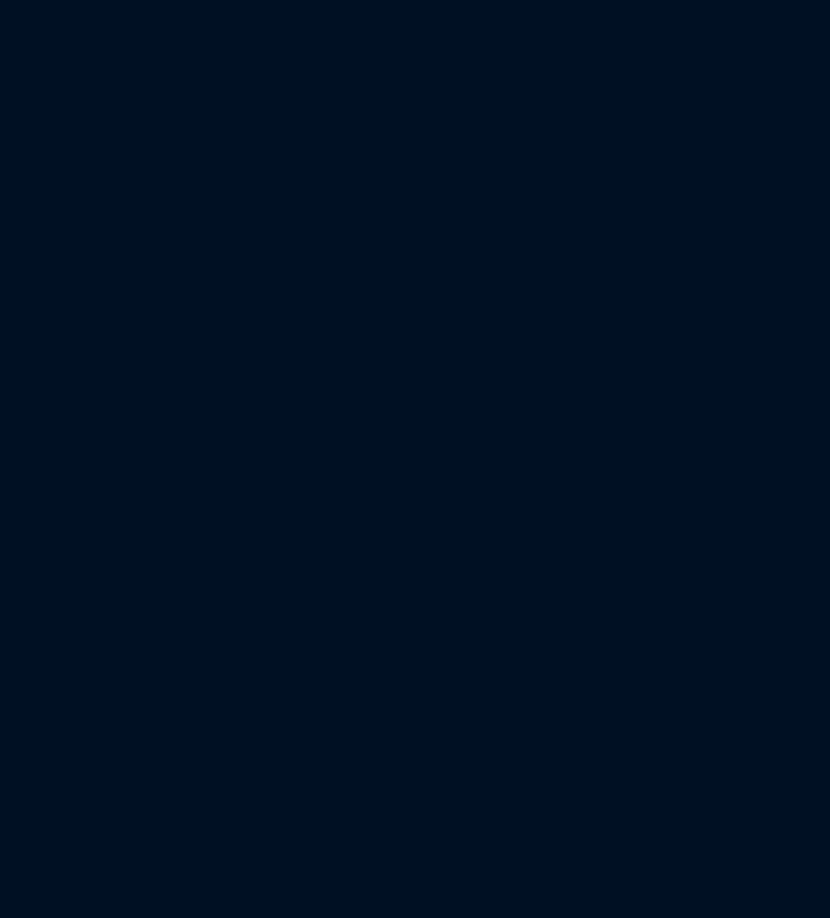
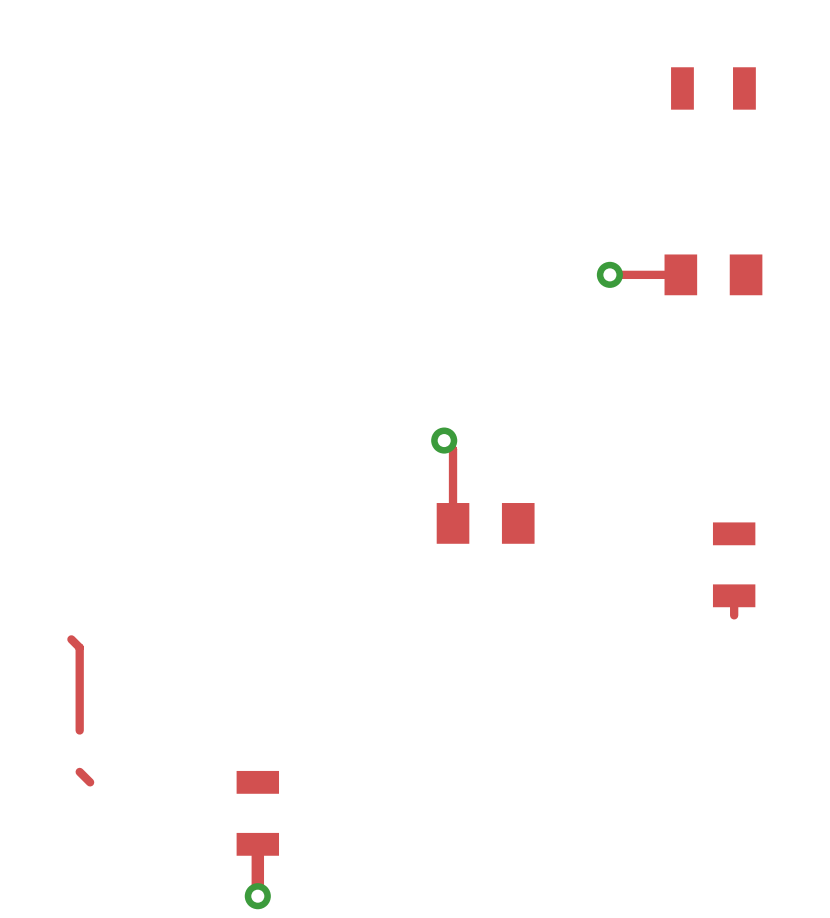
part: none -> (713, 88)
via: none -> (609, 274)
top track: none -> (680, 274) (609, 274)
part: none -> (713, 274)
top track: none -> (444, 440) (453, 449) (453, 523)
via: none -> (444, 440)
part: none -> (485, 523)
part: none -> (734, 564)
top track: none -> (734, 595) (734, 615)
top track: none -> (71, 639) (79, 647) (79, 730)
top track: none -> (79, 771) (90, 782)
part: none -> (257, 813)
top track: none -> (257, 844) (257, 896)
via: none -> (257, 896)

